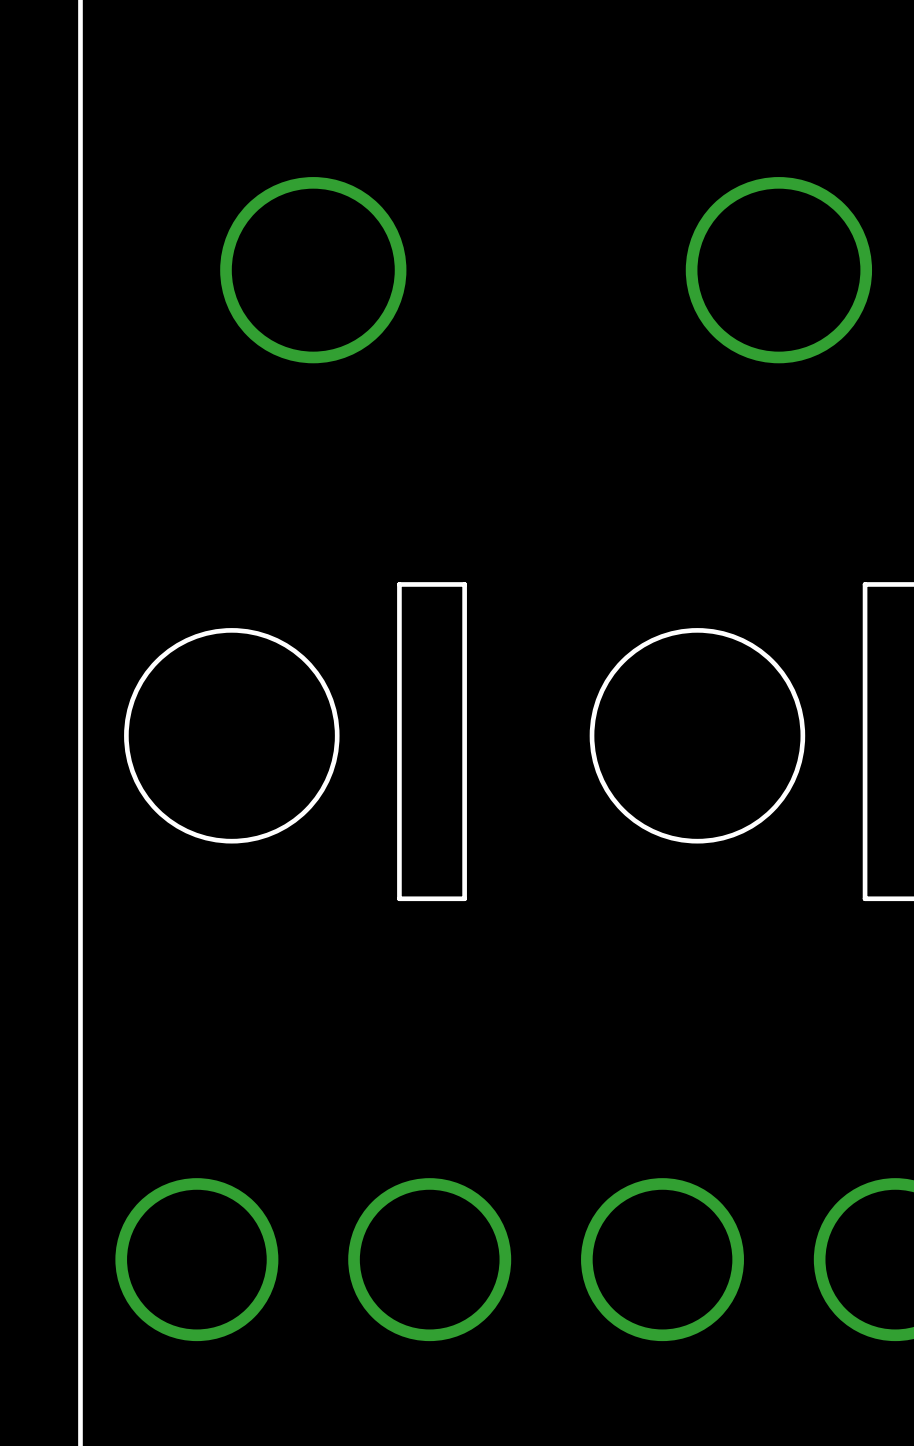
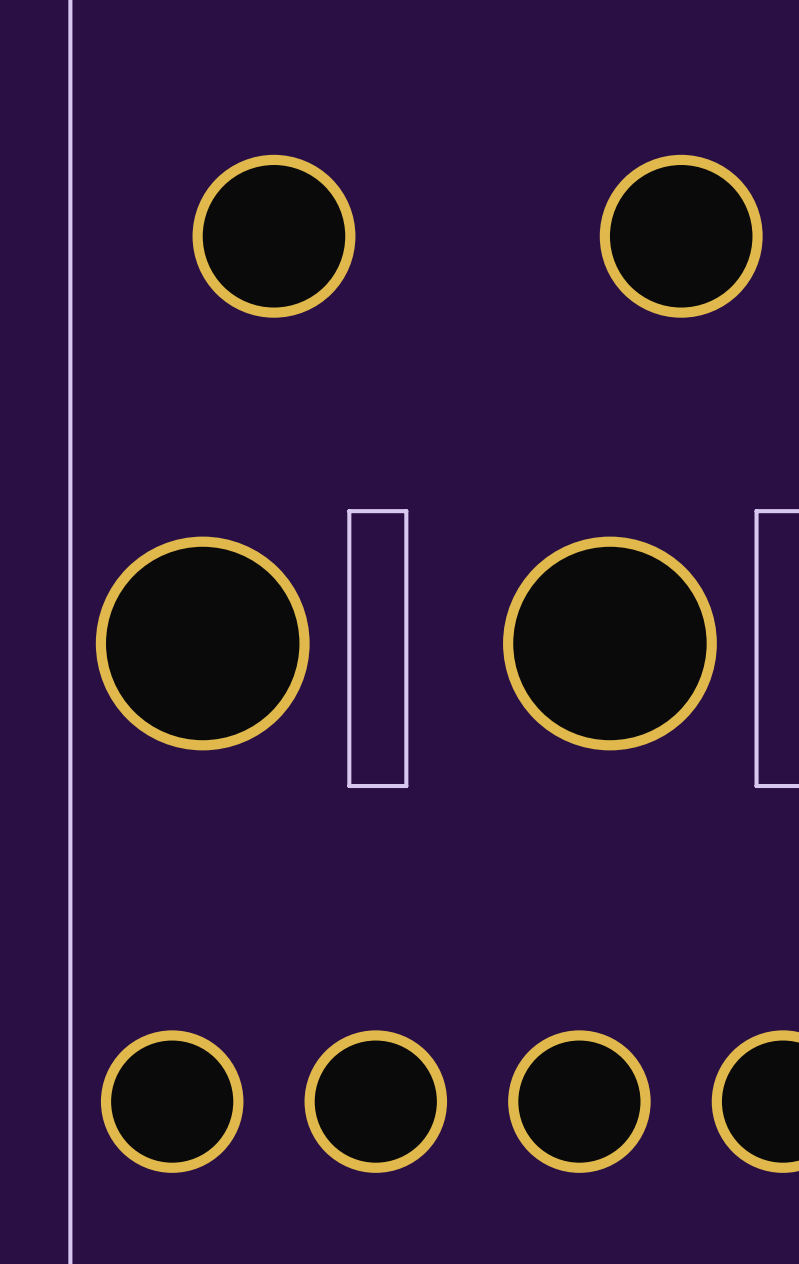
round board edge: [124, 628, 340, 844] -> none
round board edge: [589, 628, 806, 844] -> none
part: none -> (202, 643)
part: none -> (609, 643)

